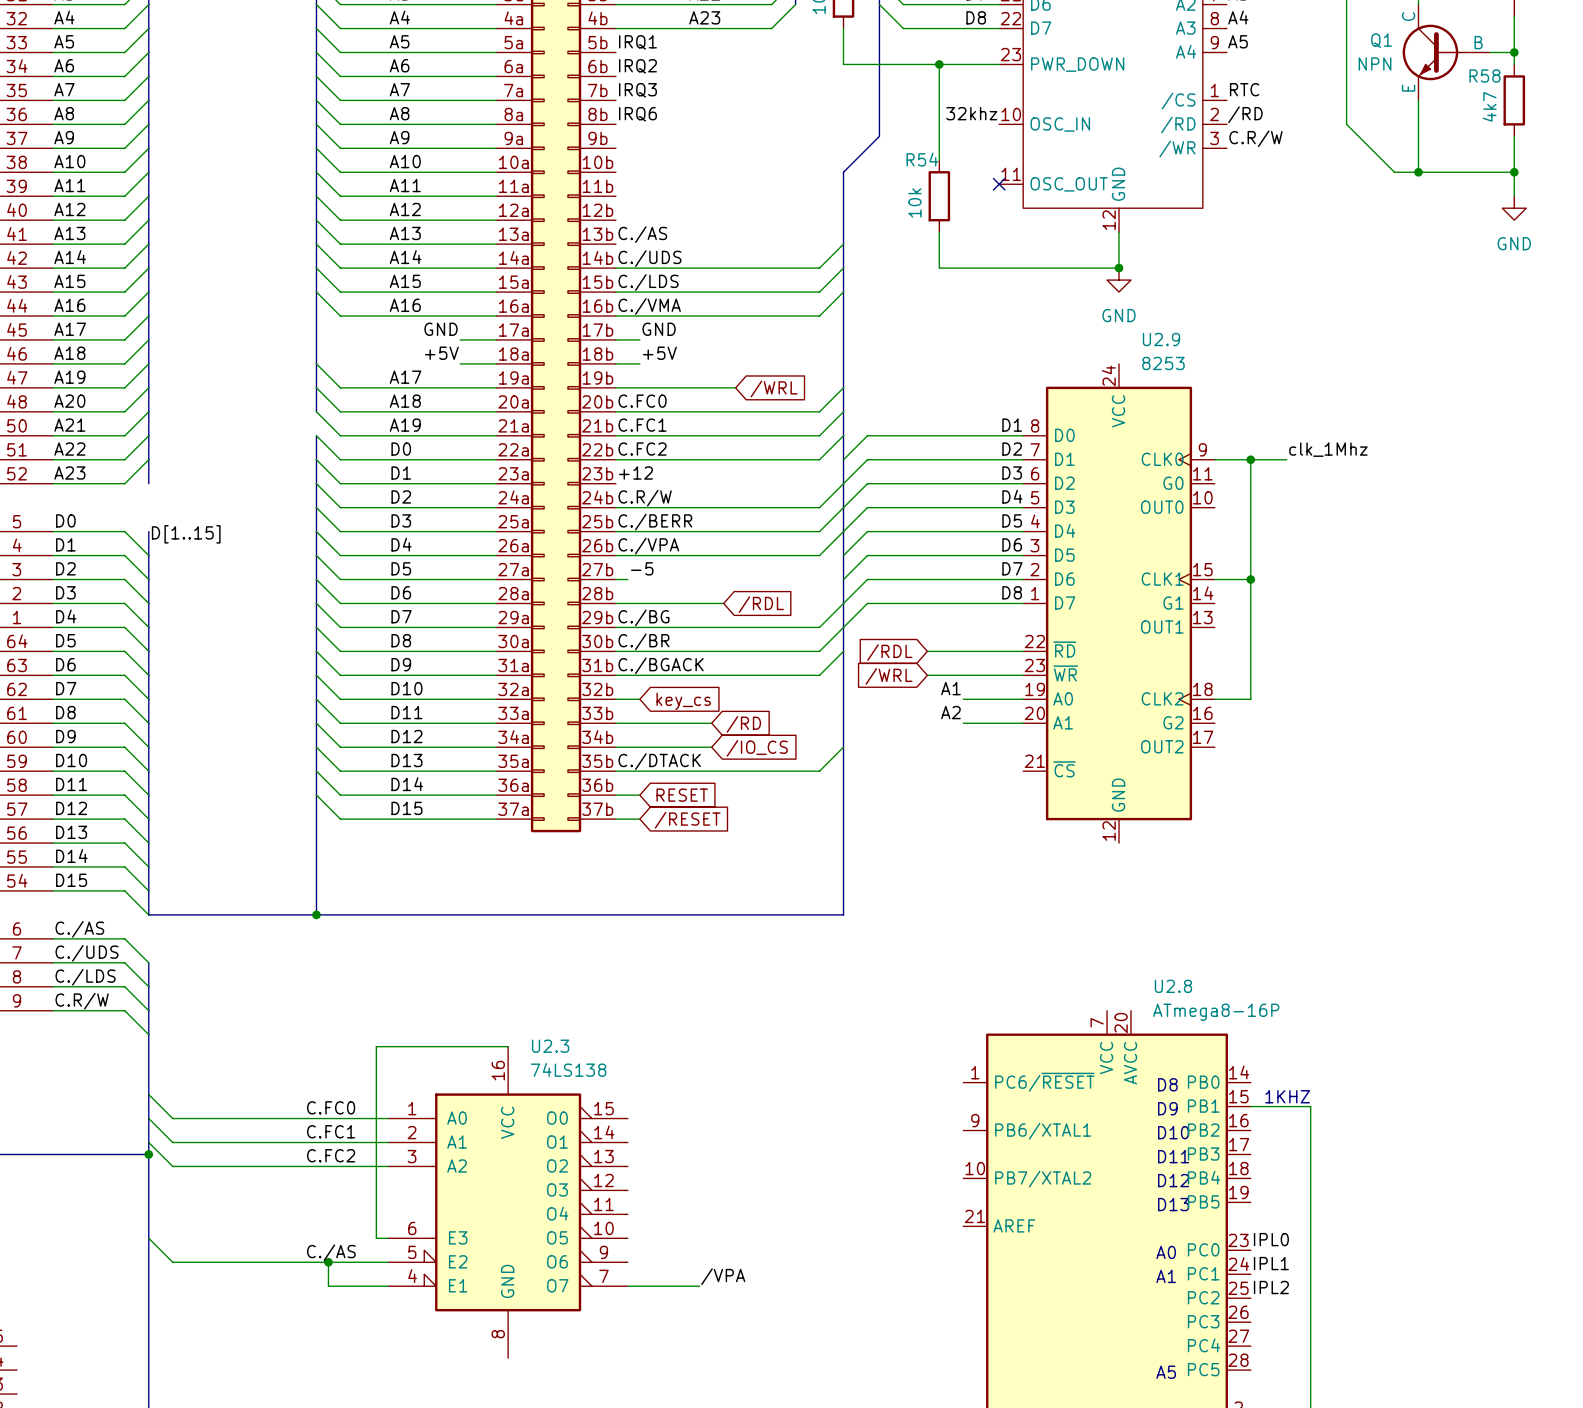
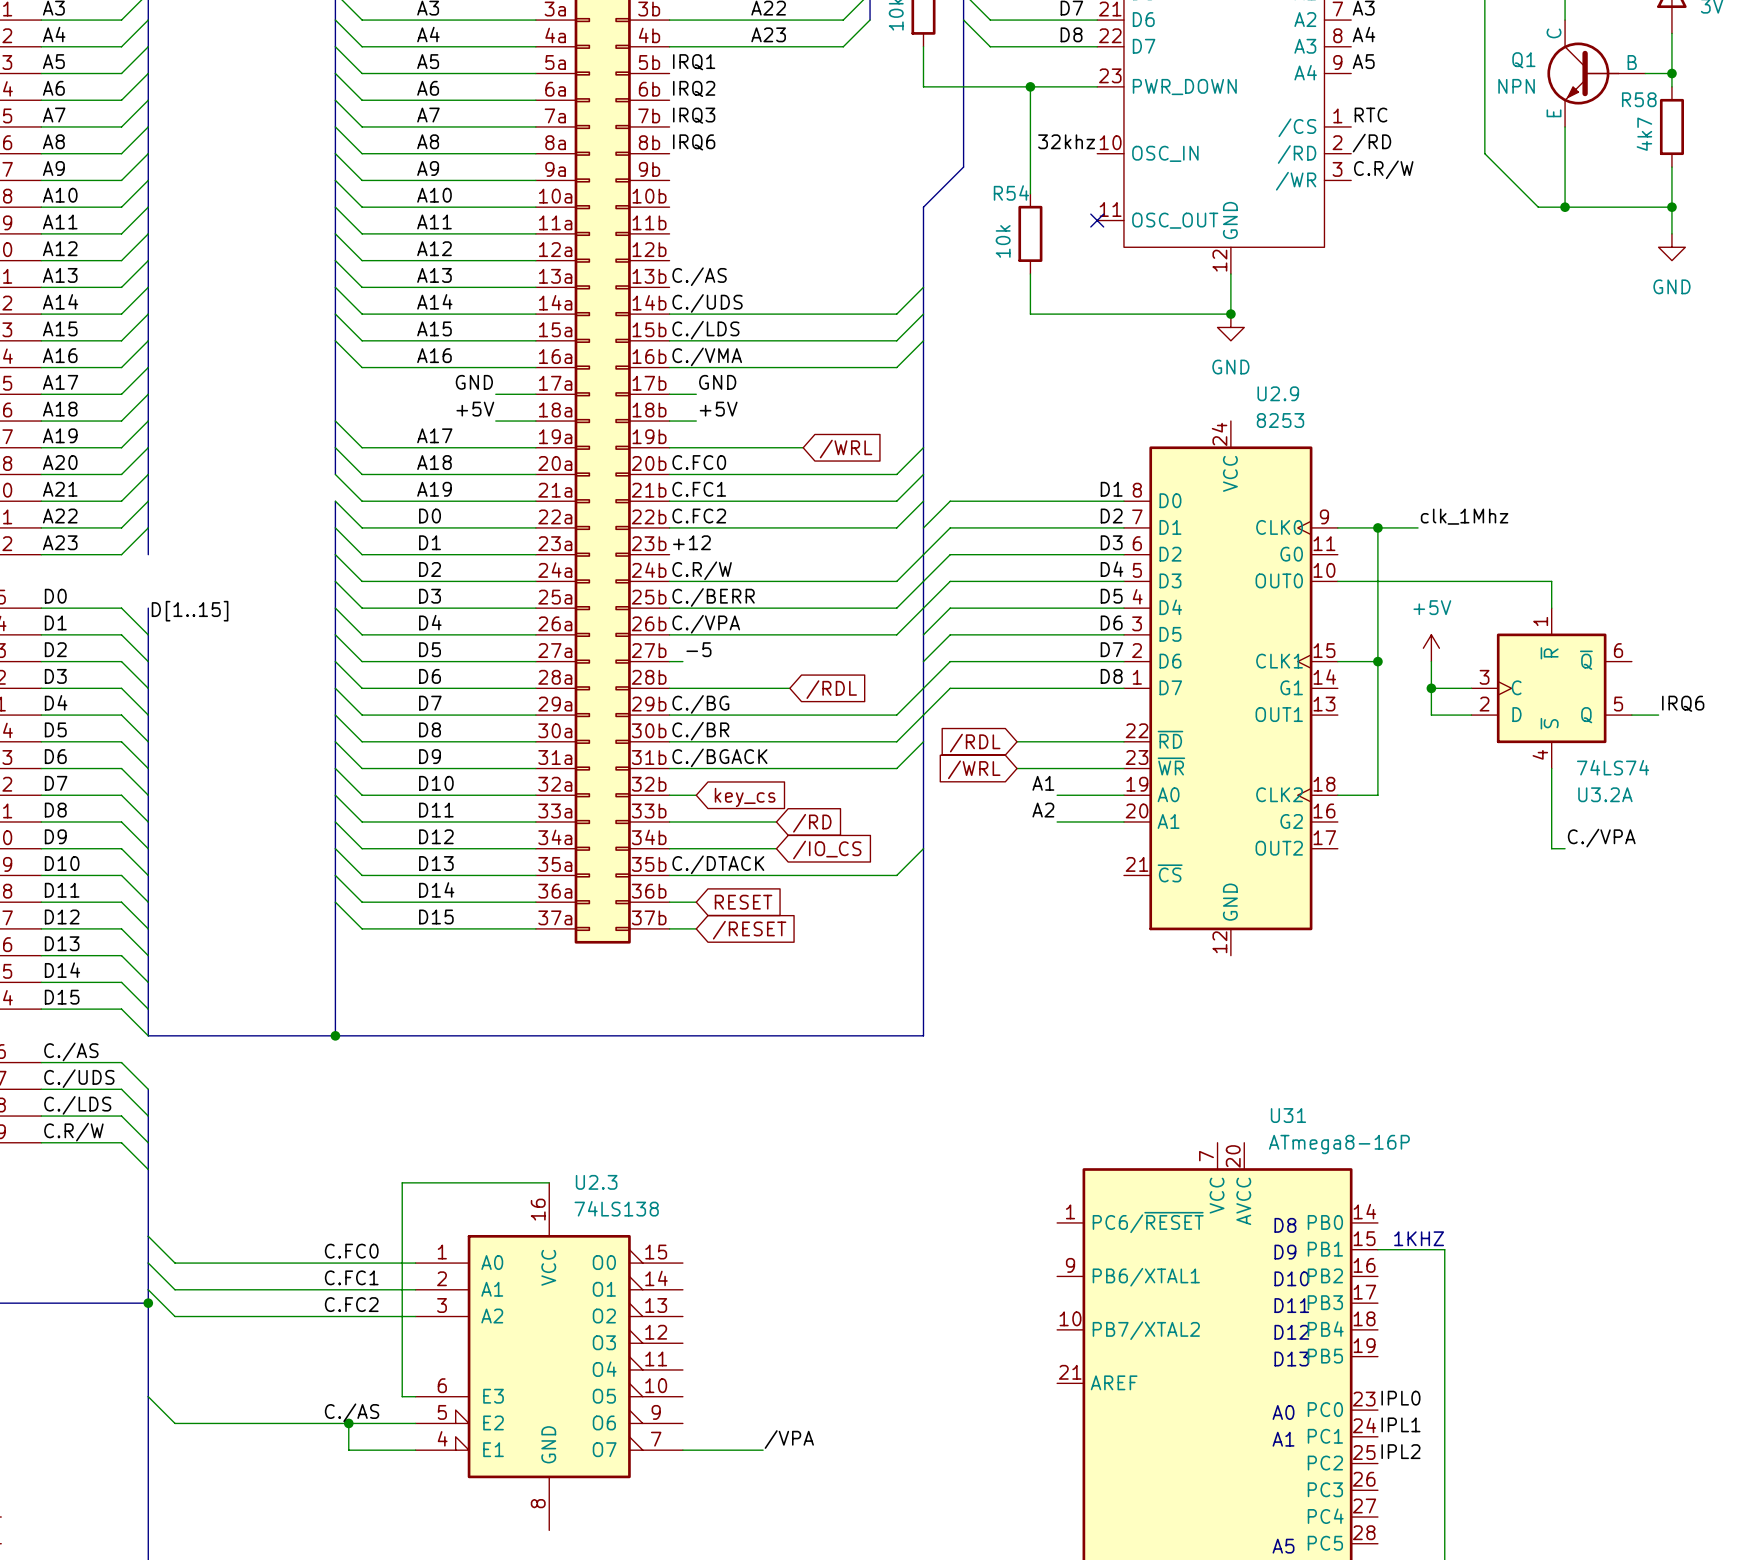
wire: none -> (1337, 581) (1551, 581) (1551, 608)
power symbol: none -> +5V (1431, 648)
wire: none -> (1431, 661) (1431, 715) (1471, 715)
wire: none -> (1431, 688) (1471, 688)
junction: none -> (1431, 688)
U3.2A: none -> 74LS74 (1551, 688)
label: none -> IRQ6 (1683, 703)
wire: none -> (1631, 715) (1658, 715)
wire: none -> (1551, 768) (1551, 848) (1565, 848)
label: none -> C./VPA (1601, 838)
U2.8 name: U2.8 (1173, 986) -> U31 (1288, 1115)

